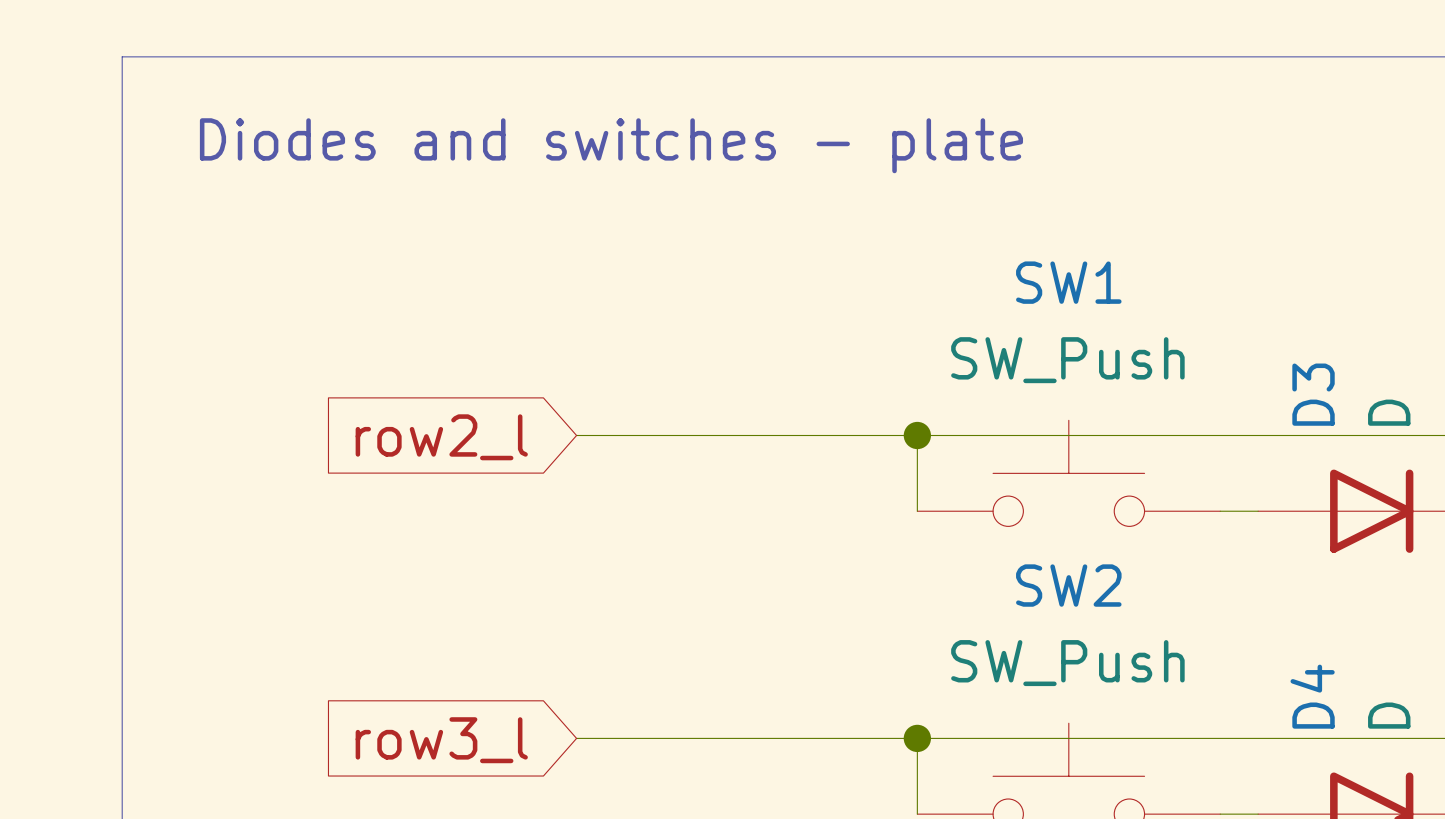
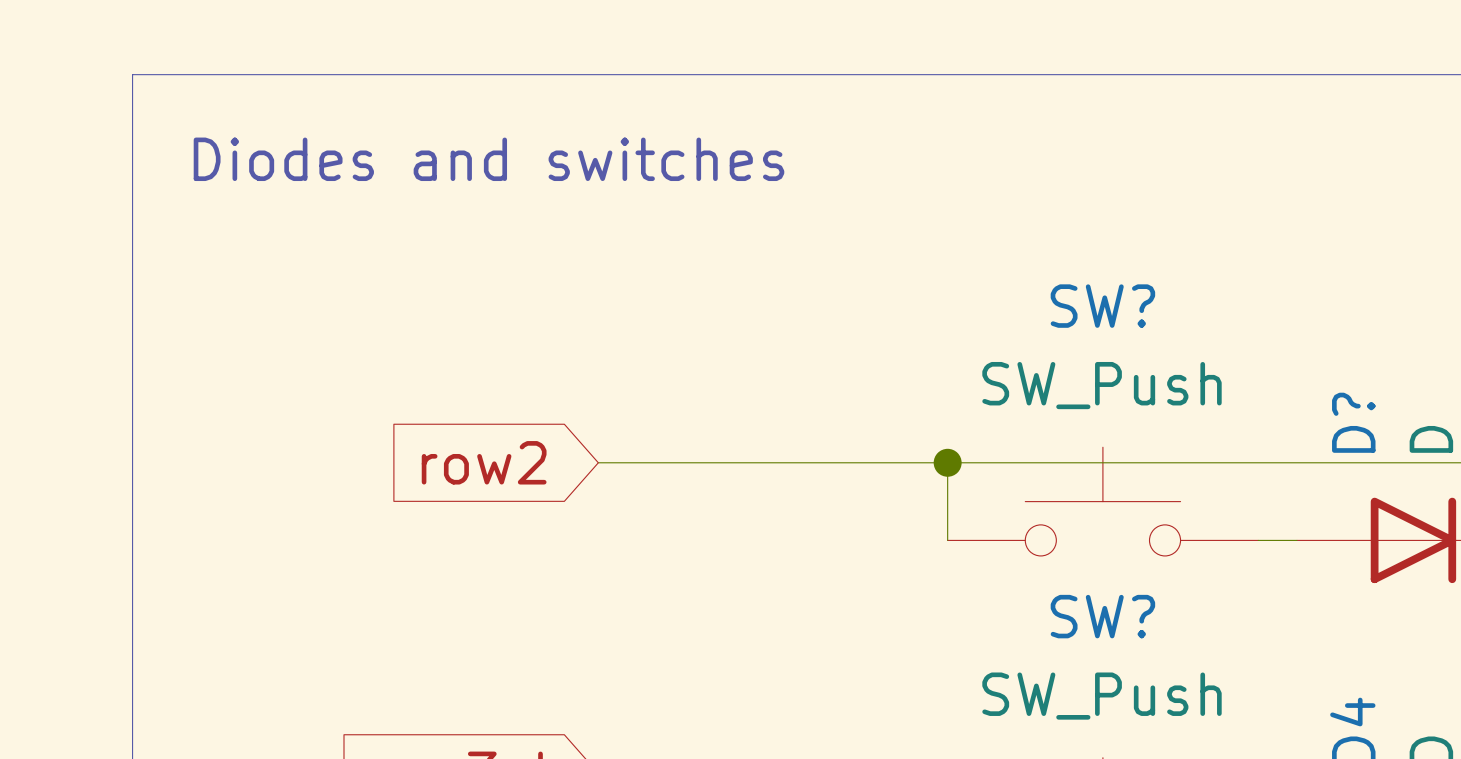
text: Diodes and switches - plate (611, 145) -> Diodes and switches (488, 159)
SW1 name: SW1 (1068, 282) -> SW? (1102, 306)
D3 name: D3 (1313, 394) -> D? (1353, 422)
global label: row2_l (441, 437) -> row2 (484, 462)
SW2 name: SW2 (1068, 585) -> SW? (1102, 616)

